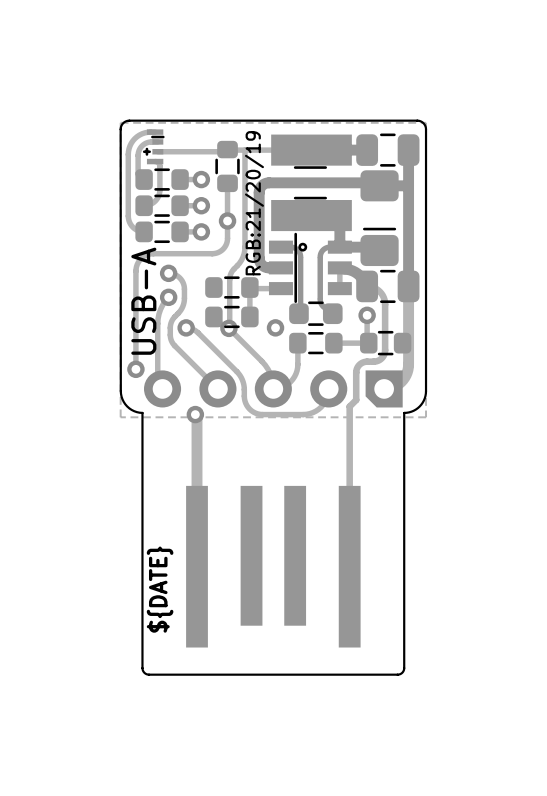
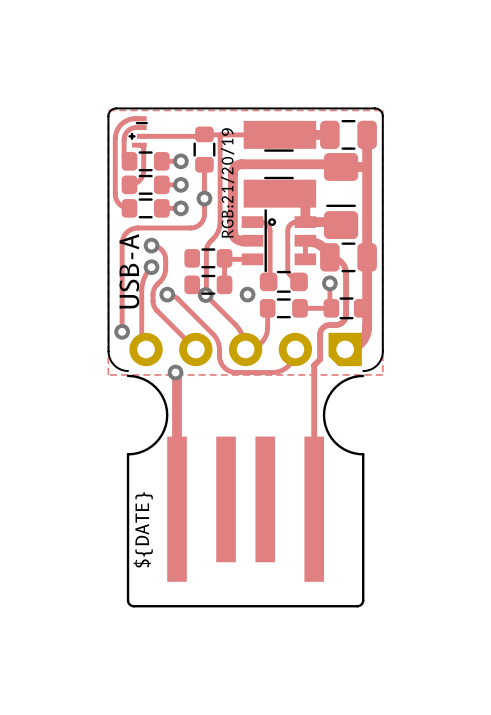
part footprint: [141, 411, 406, 676] -> [126, 374, 365, 608]

